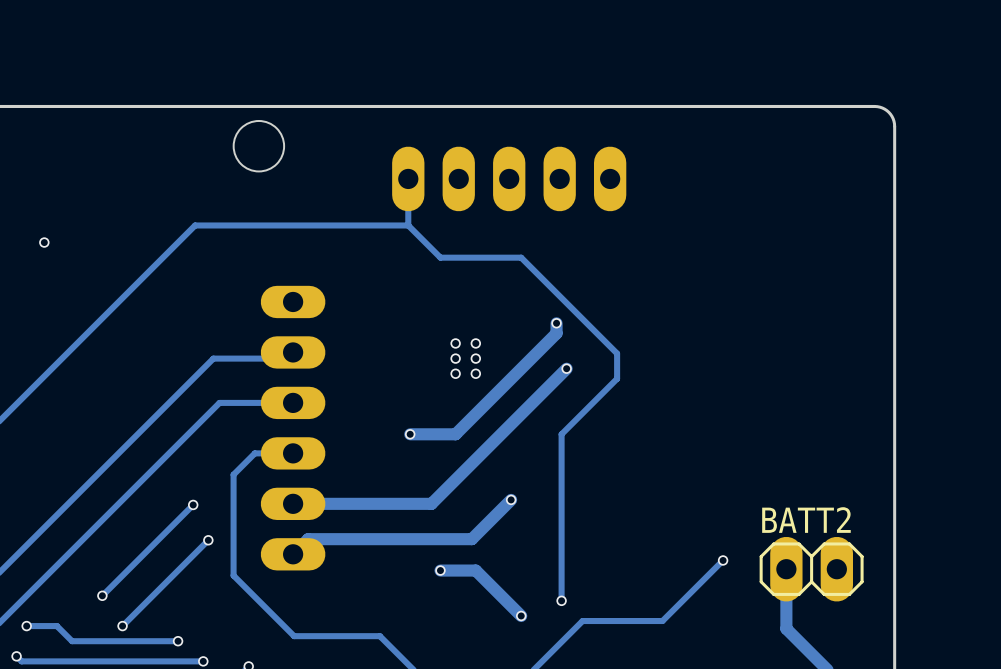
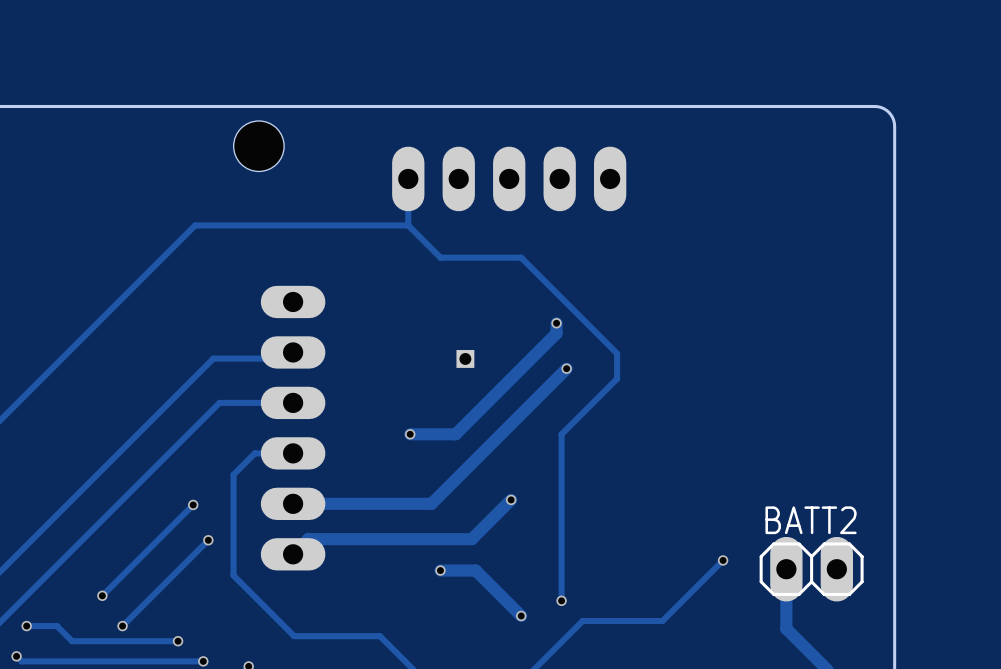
via: (44, 242) -> none
via: (455, 343) -> none
via: (475, 343) -> none
via: (455, 358) -> none
part: none -> (465, 358)
via: (475, 358) -> none
via: (455, 373) -> none
via: (475, 373) -> none

